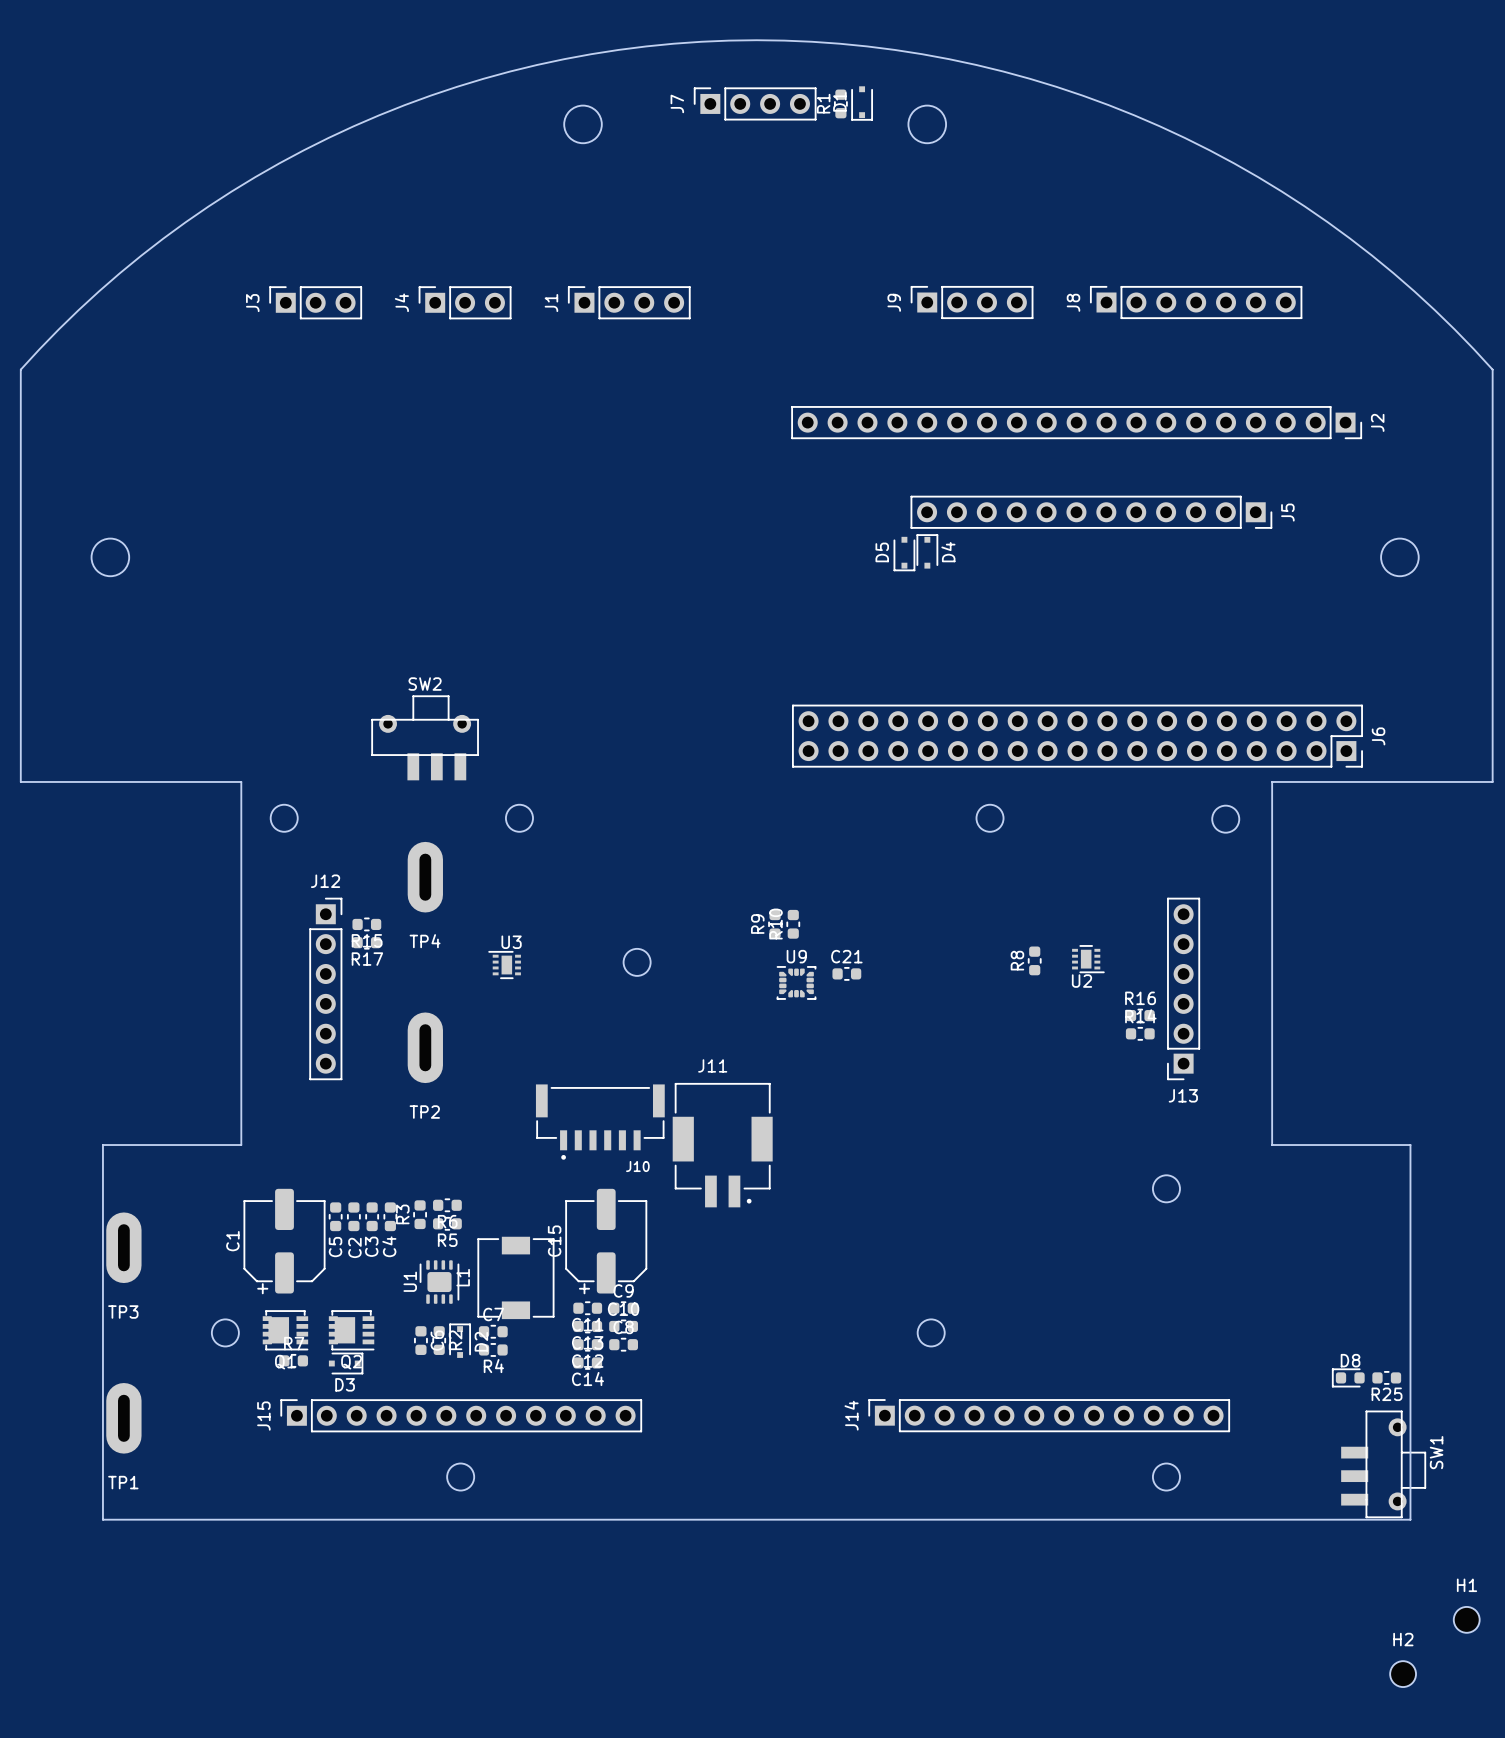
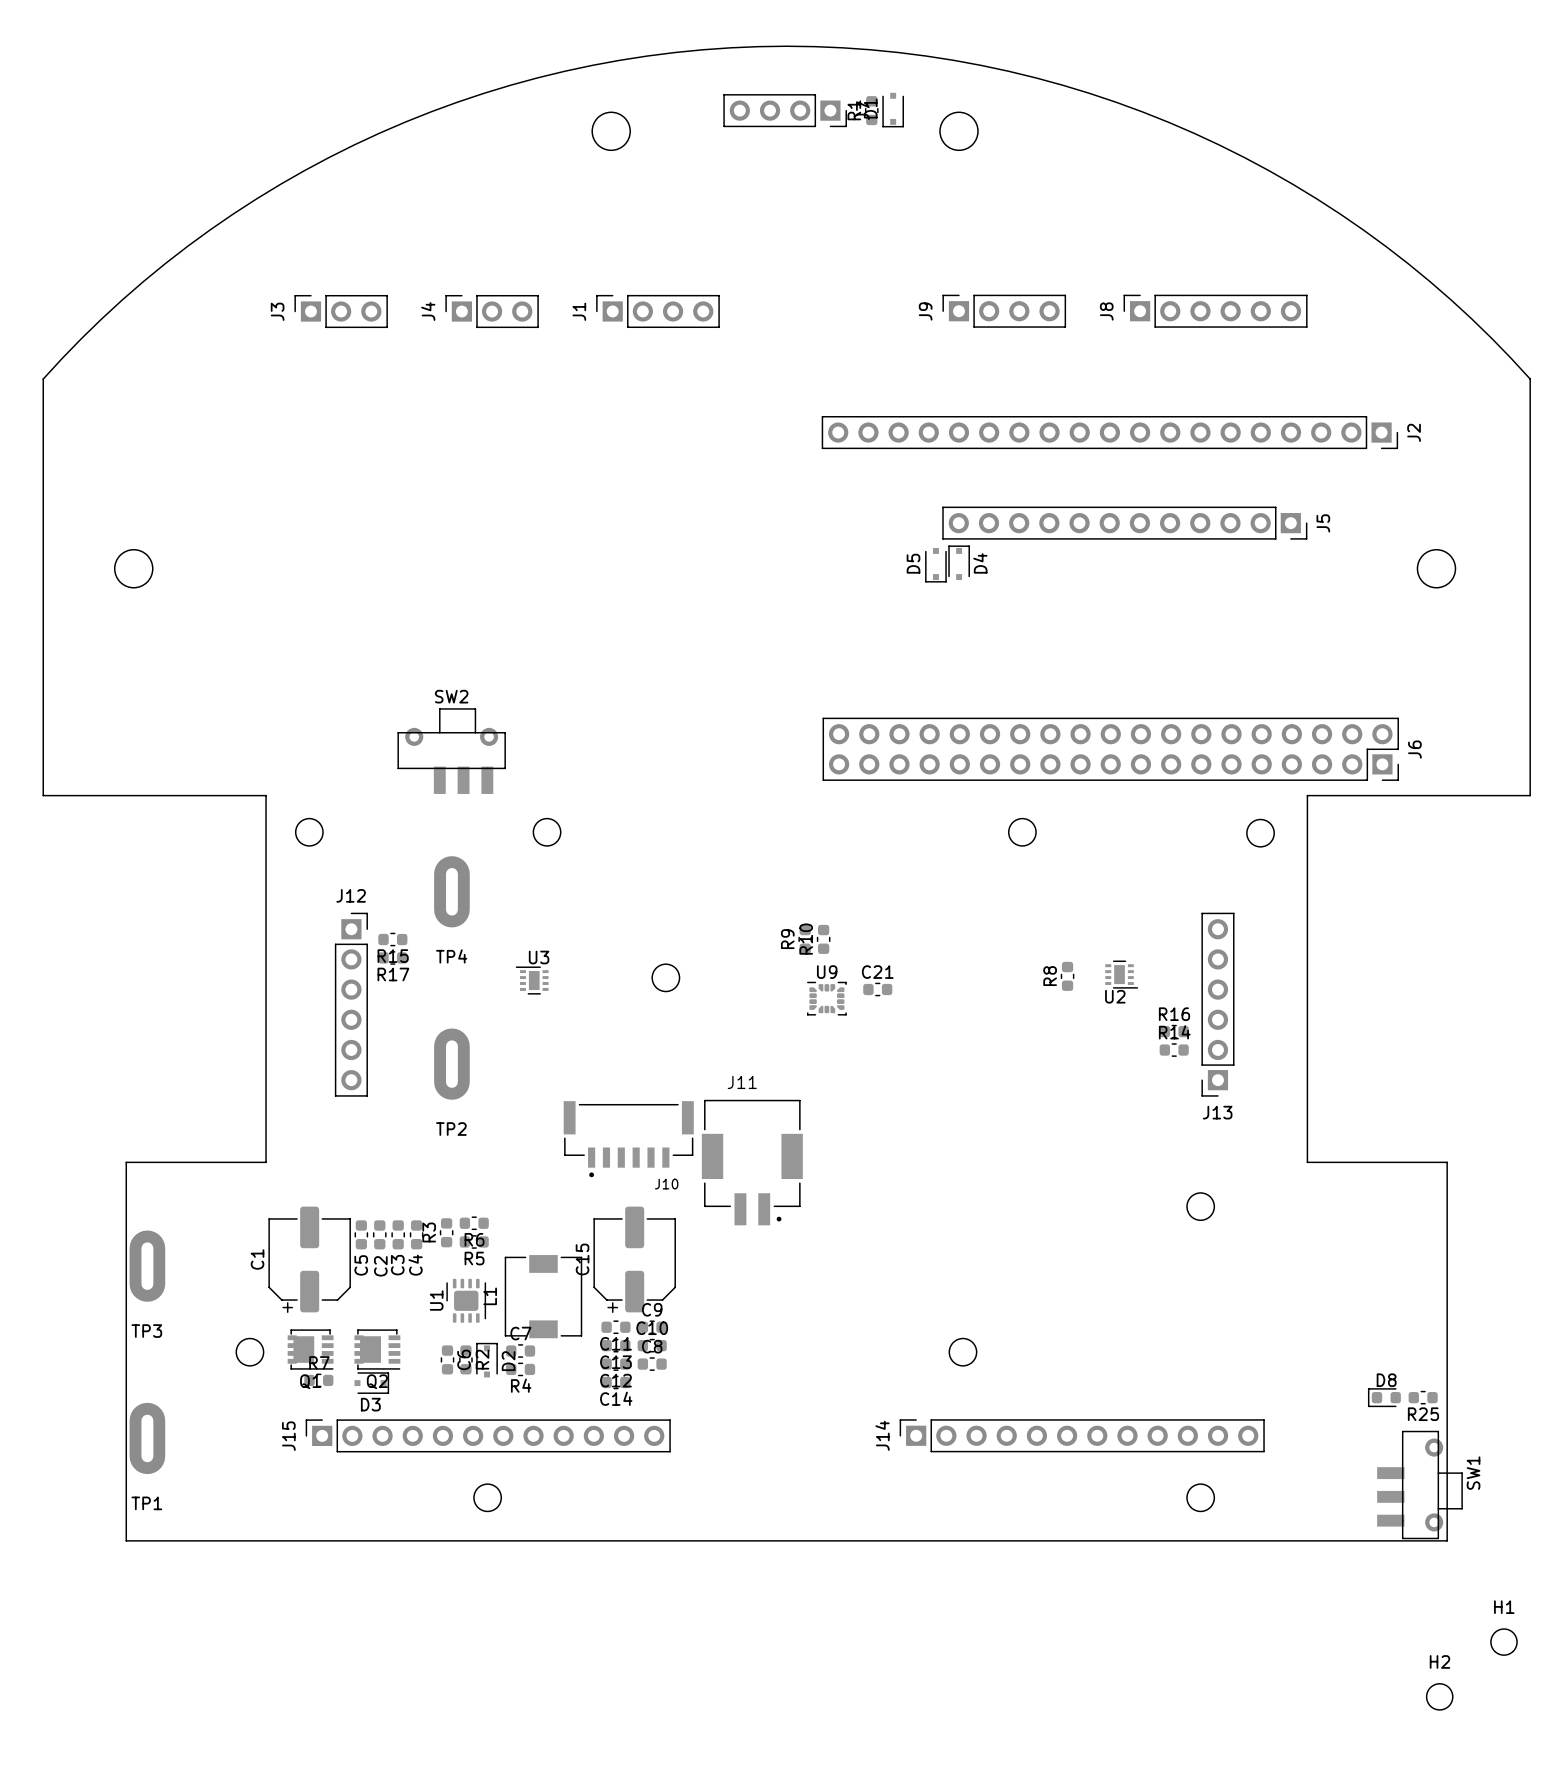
J7 rotation: 0° (755, 103) -> 180° (785, 110)
J8 footprint: [1090, 286, 1303, 319] -> [1123, 294, 1308, 328]

